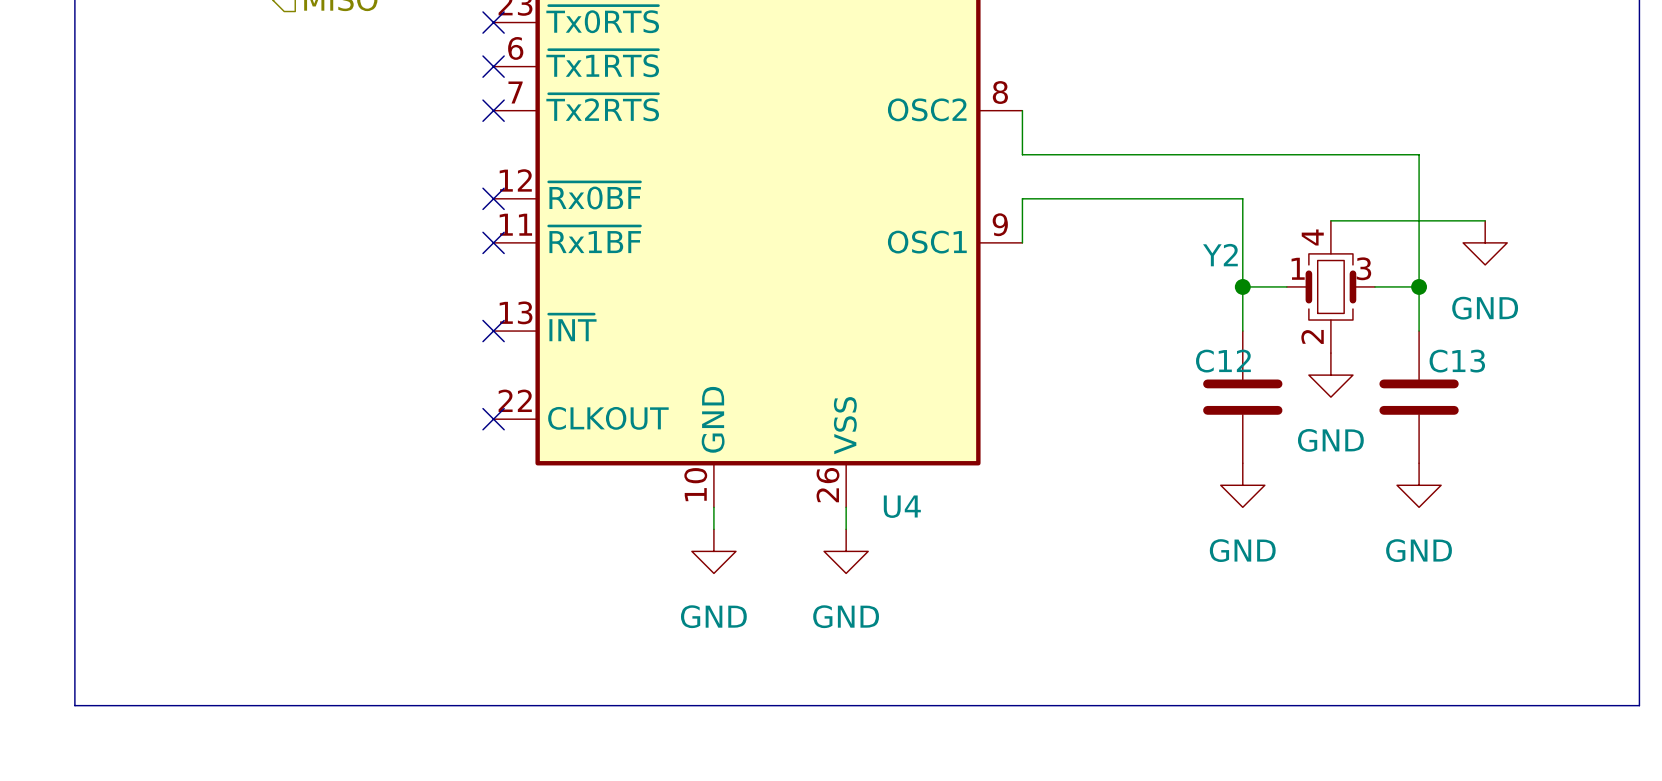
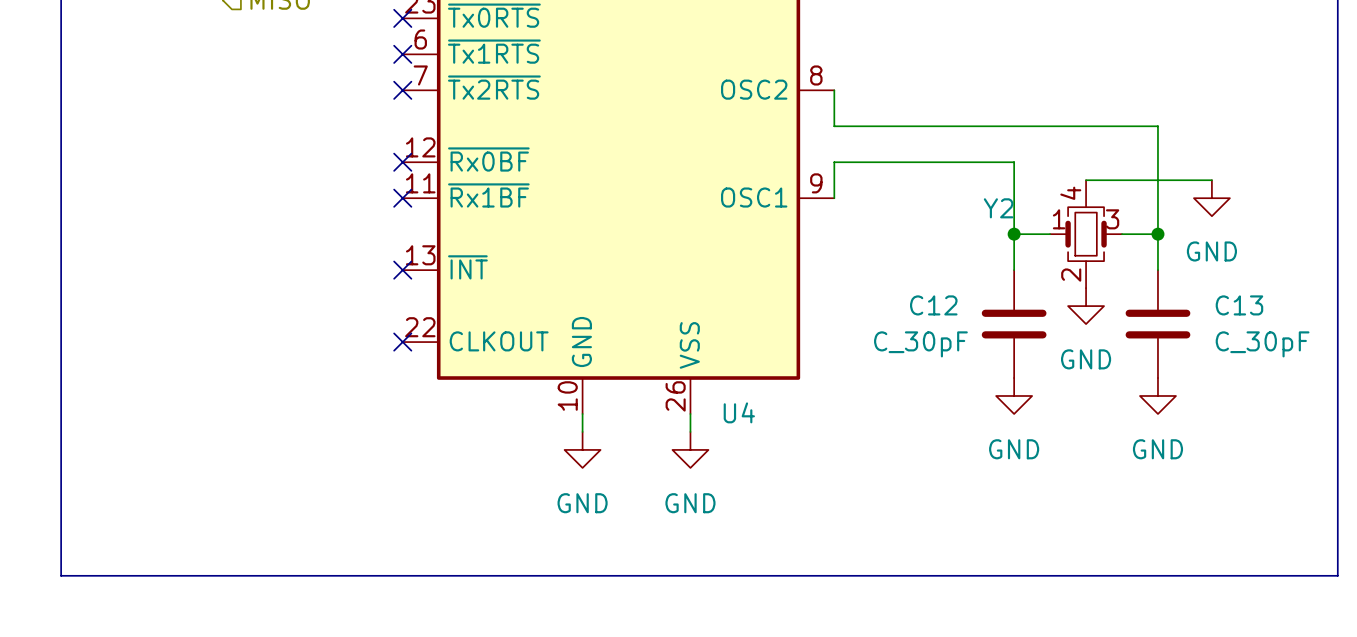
C12 name position: C12 (1223, 361) -> C12 (933, 305)
C13 name position: C13 (1457, 361) -> C13 (1239, 305)
C12 value: none -> C_30pF (920, 344)
C13 value: none -> C_30pF (1262, 344)

